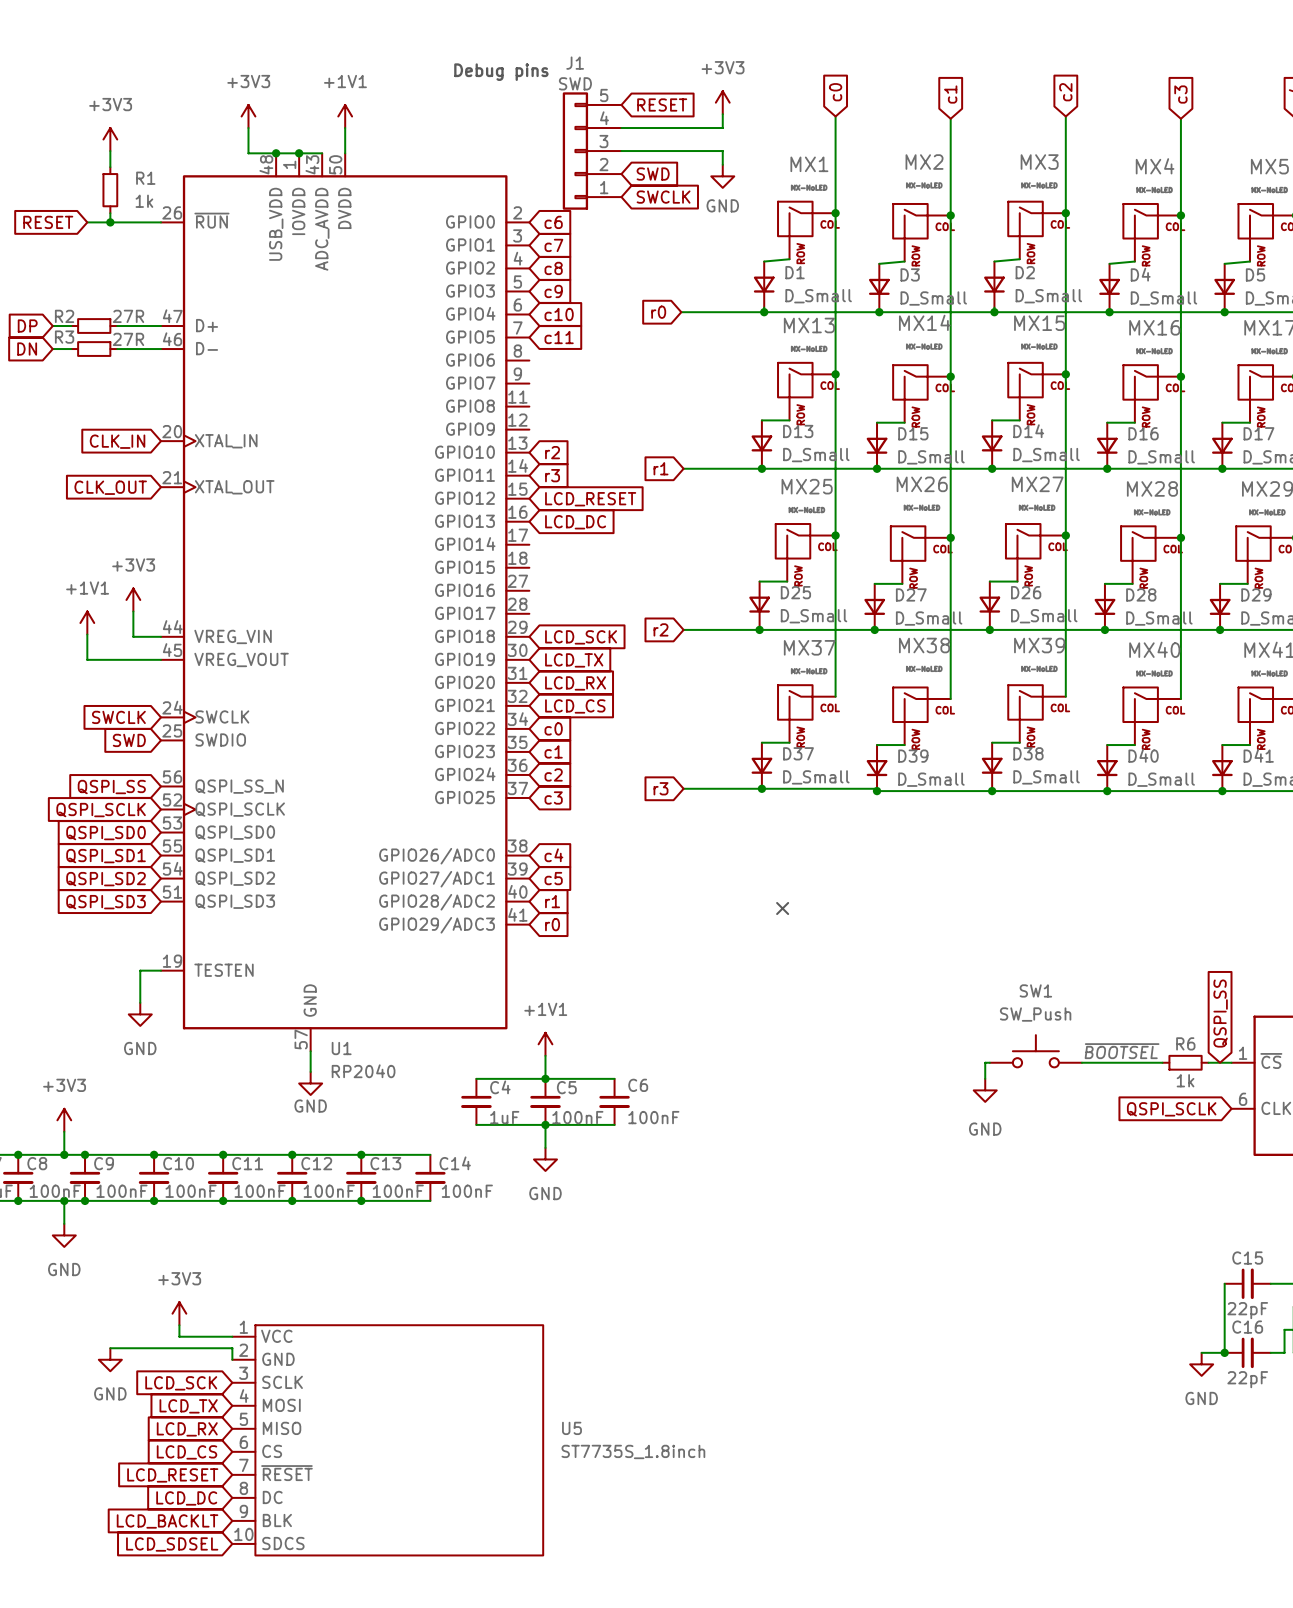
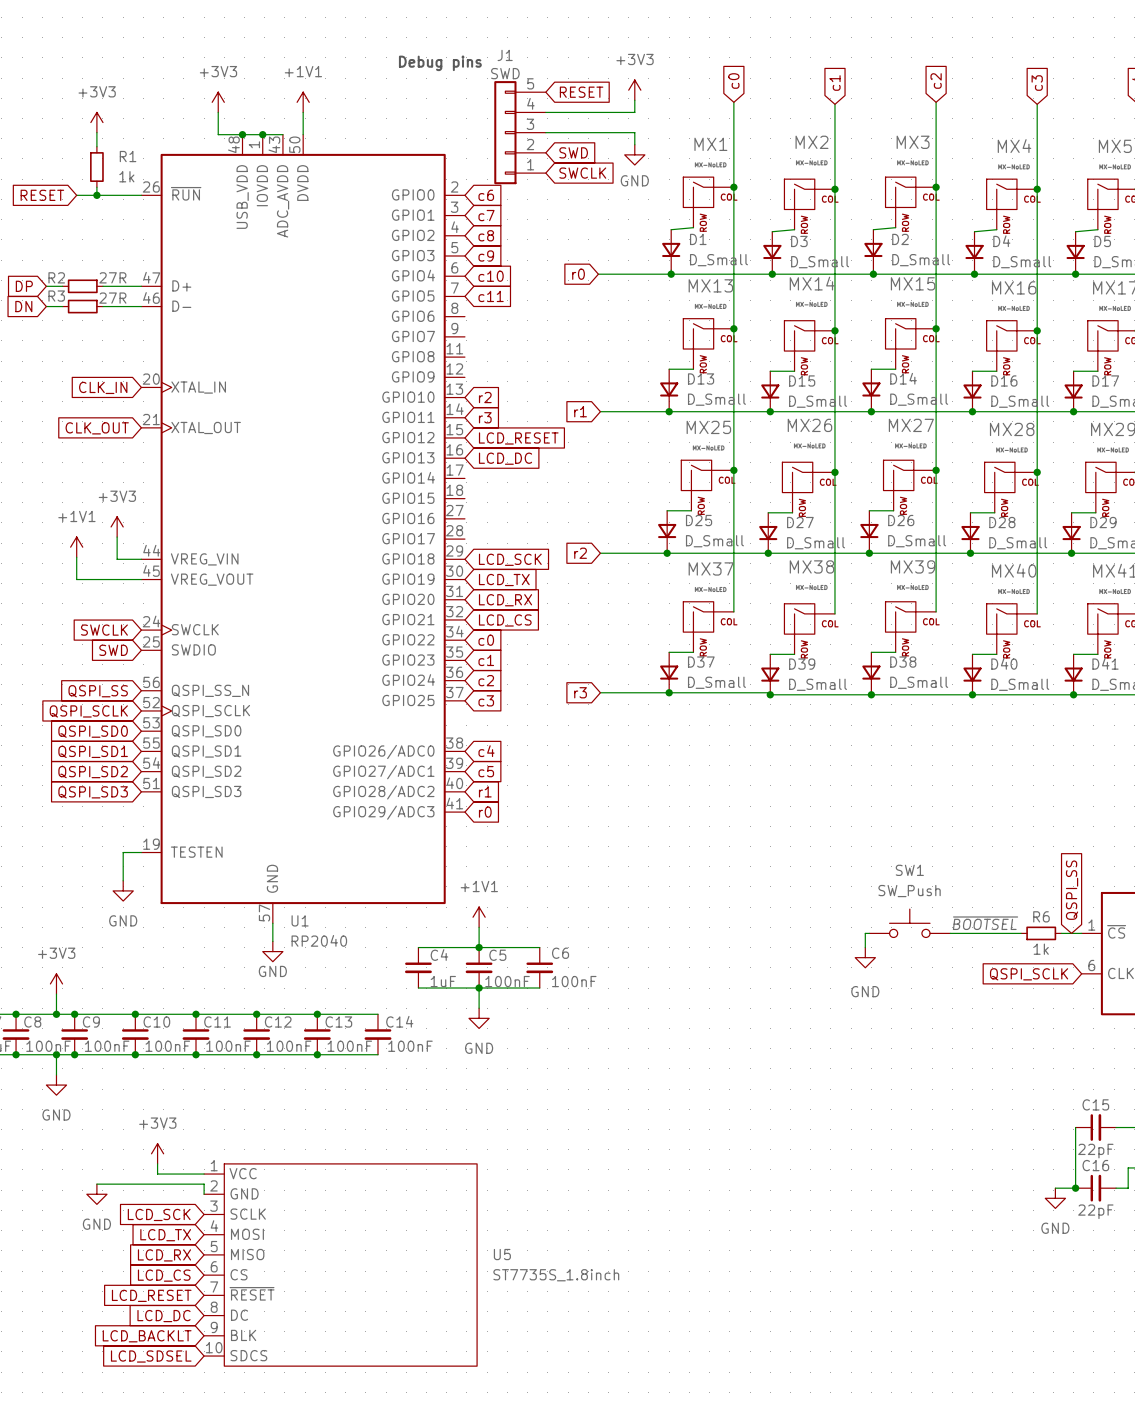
no-connect mark: (782, 908) -> none

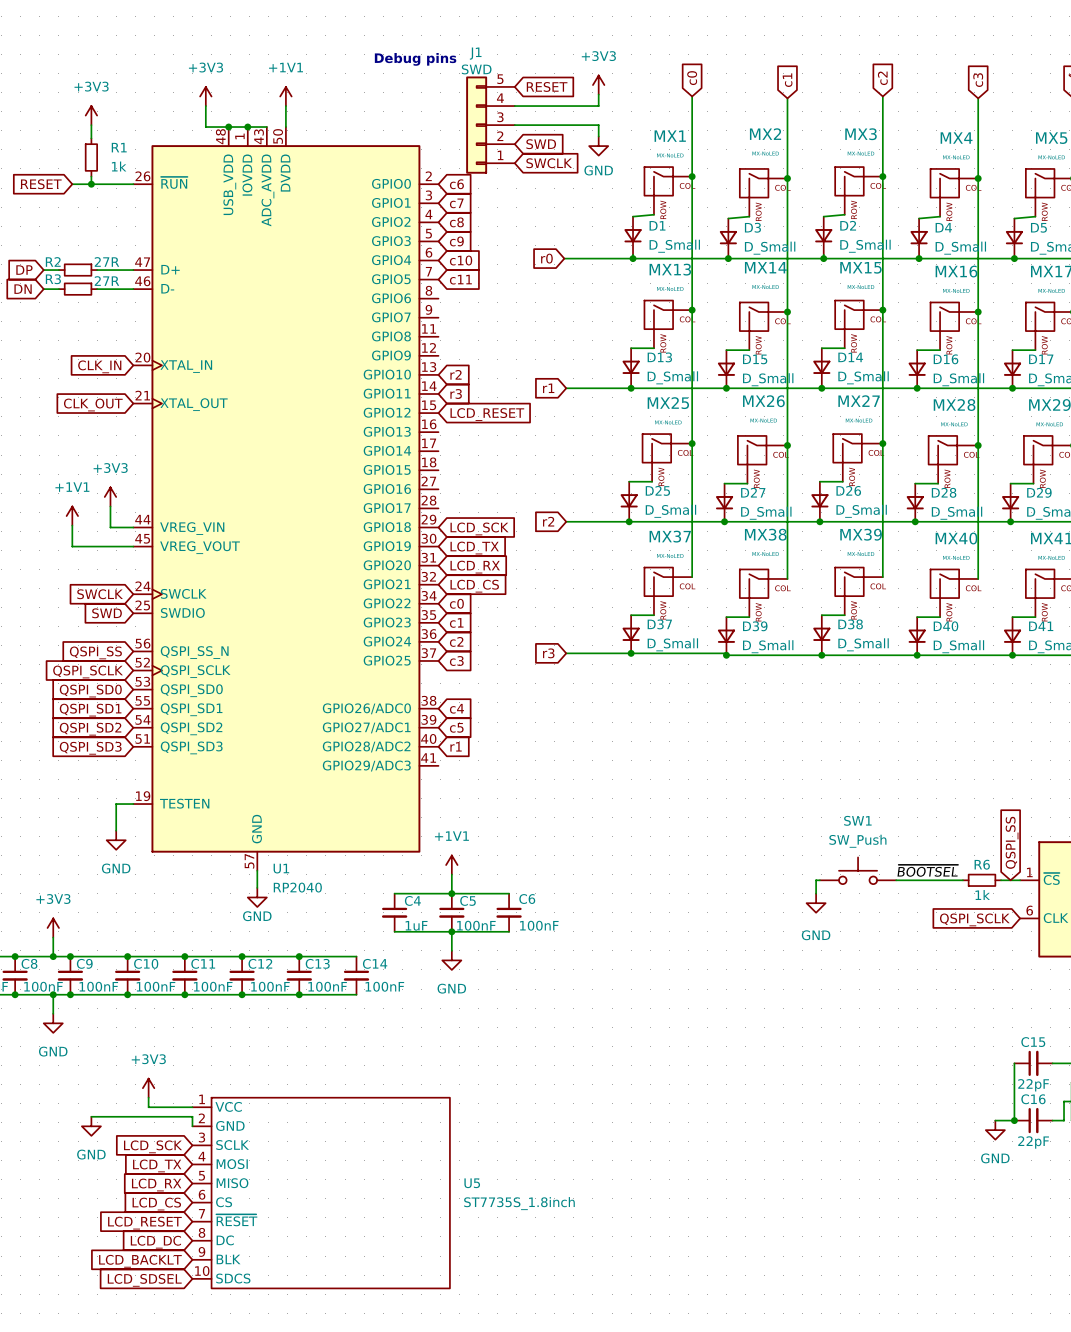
global label: LCD_DC (505, 458) -> none
global label: r0 (485, 812) -> none

